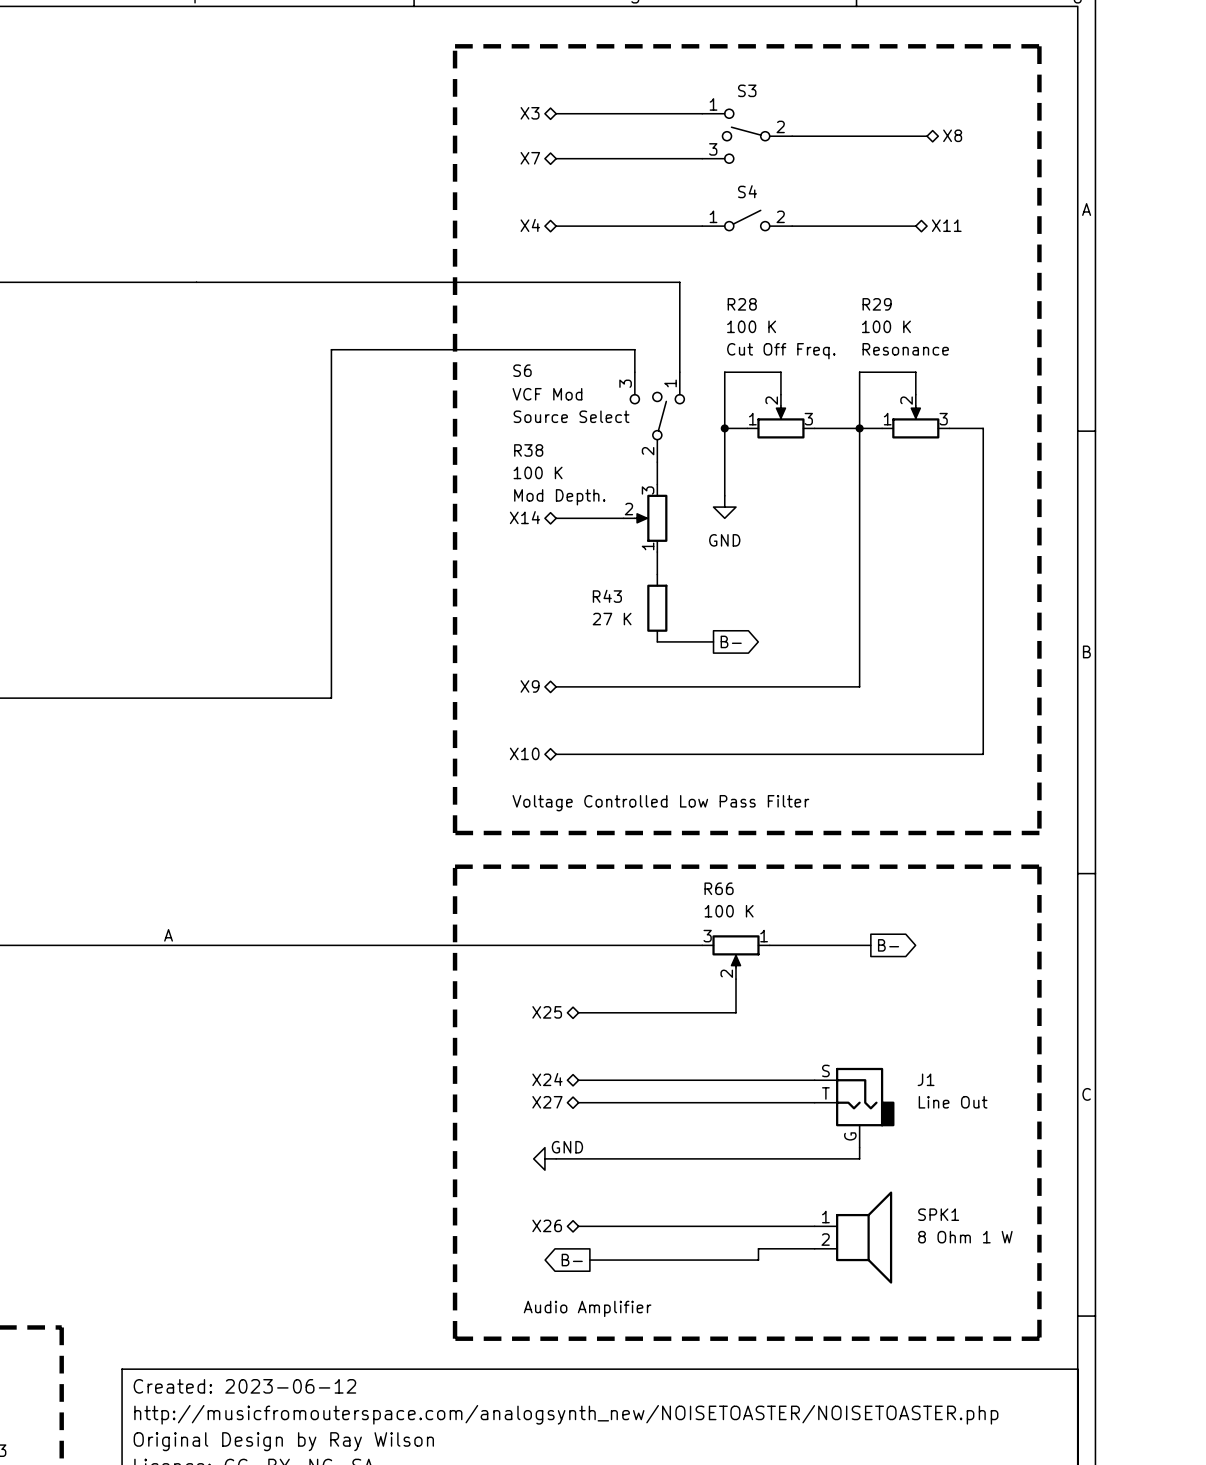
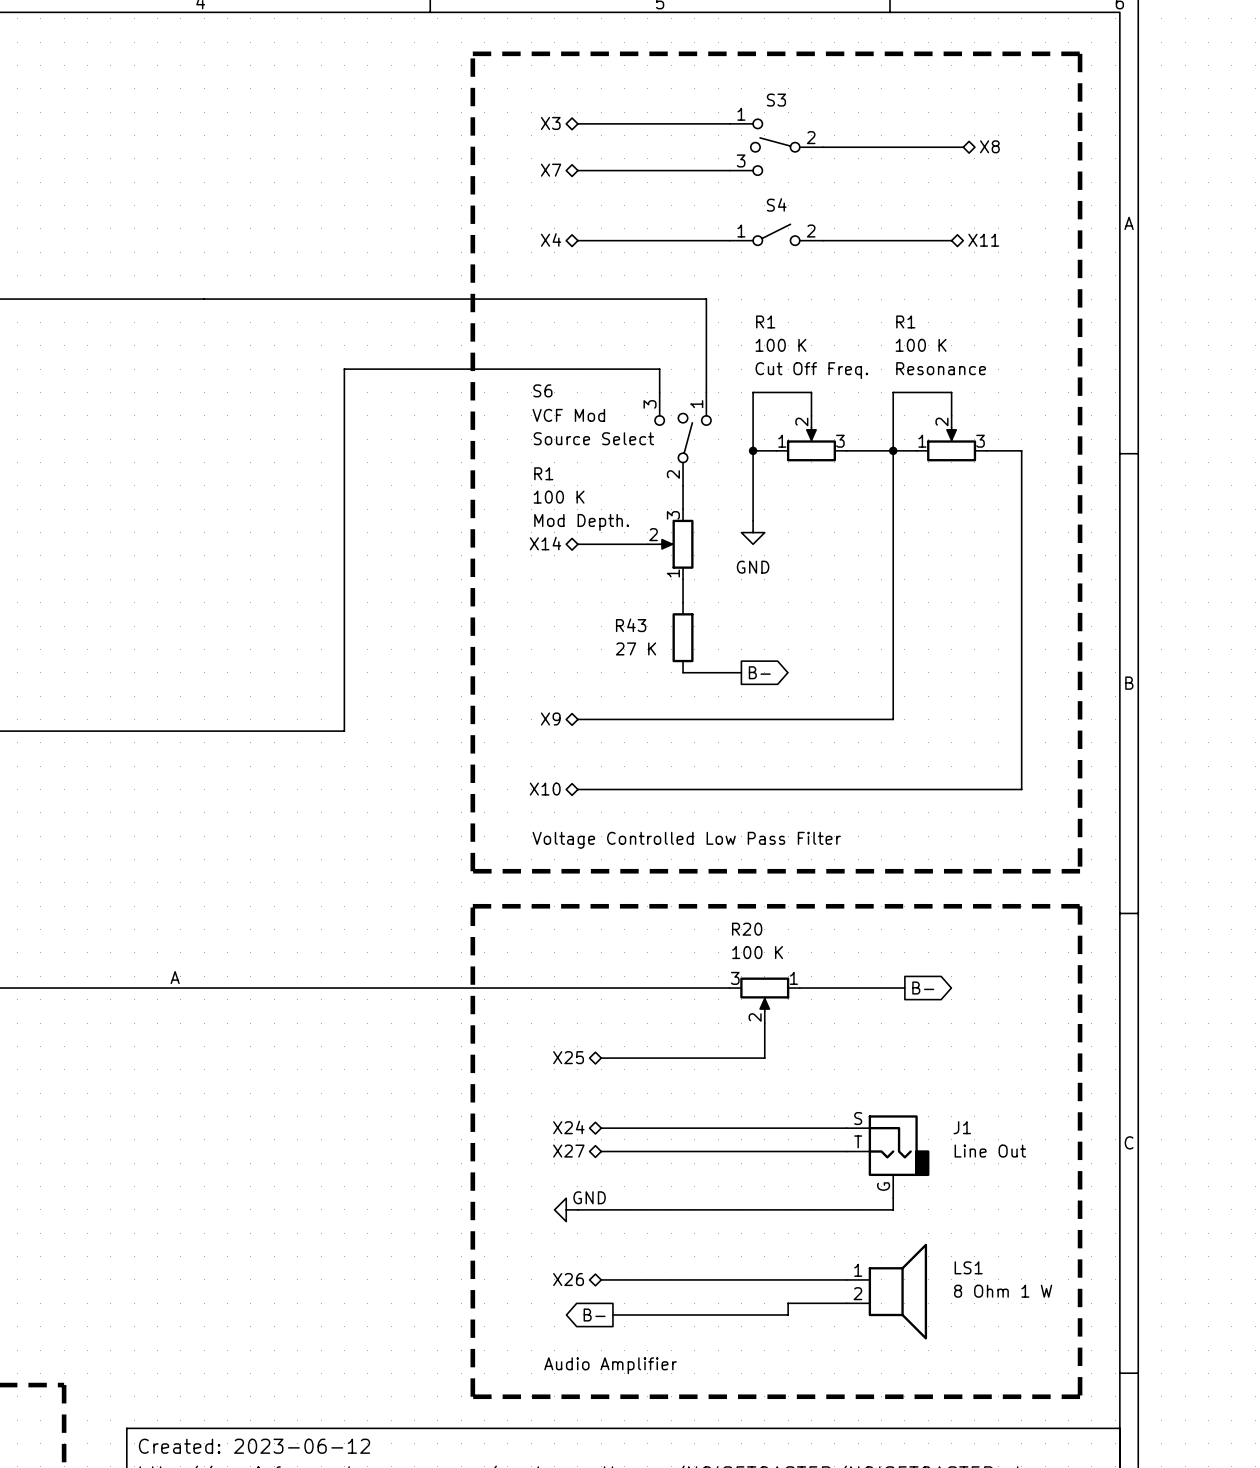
R28 name: R28 (742, 304) -> R1 (765, 321)
R29 name: R29 (877, 304) -> R1 (905, 321)
R38 name: R38 (528, 450) -> R1 (543, 473)
R66 name: R66 (719, 888) -> R20 (747, 929)
SPK1 name: SPK1 (938, 1214) -> LS1 (968, 1267)

